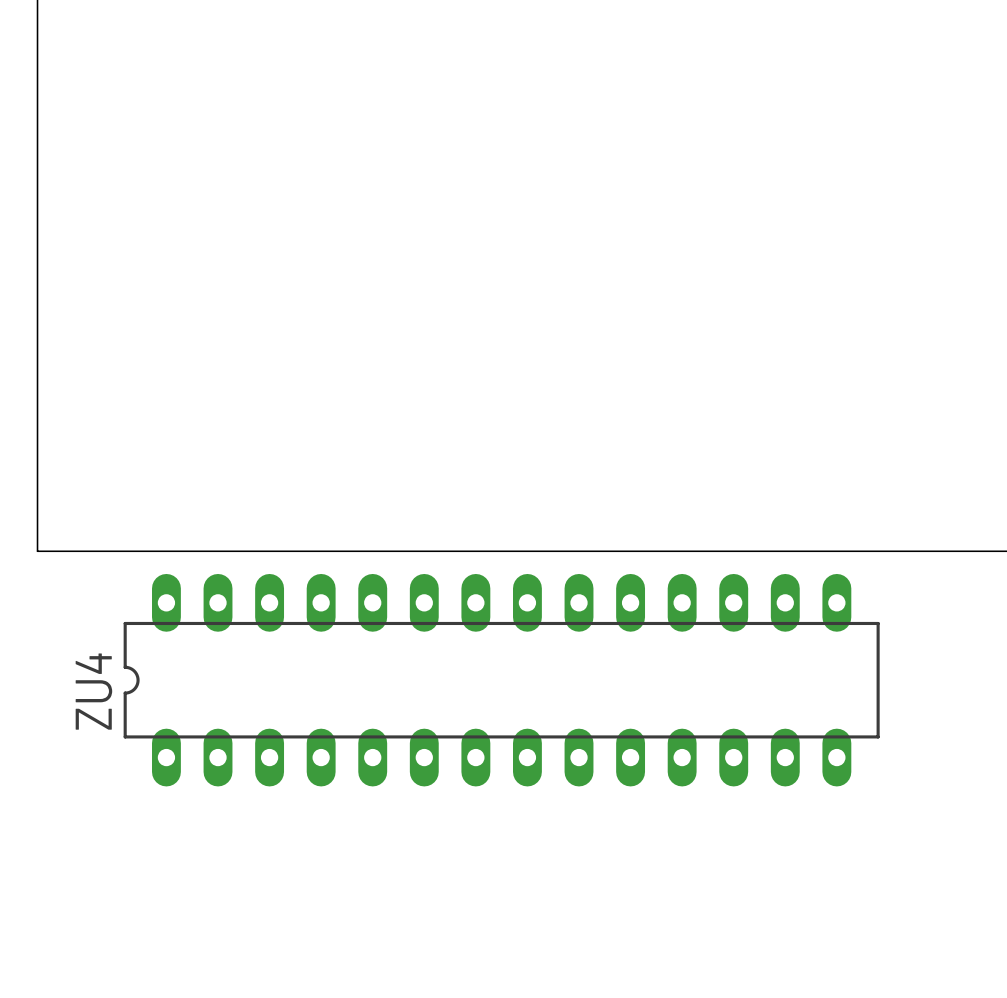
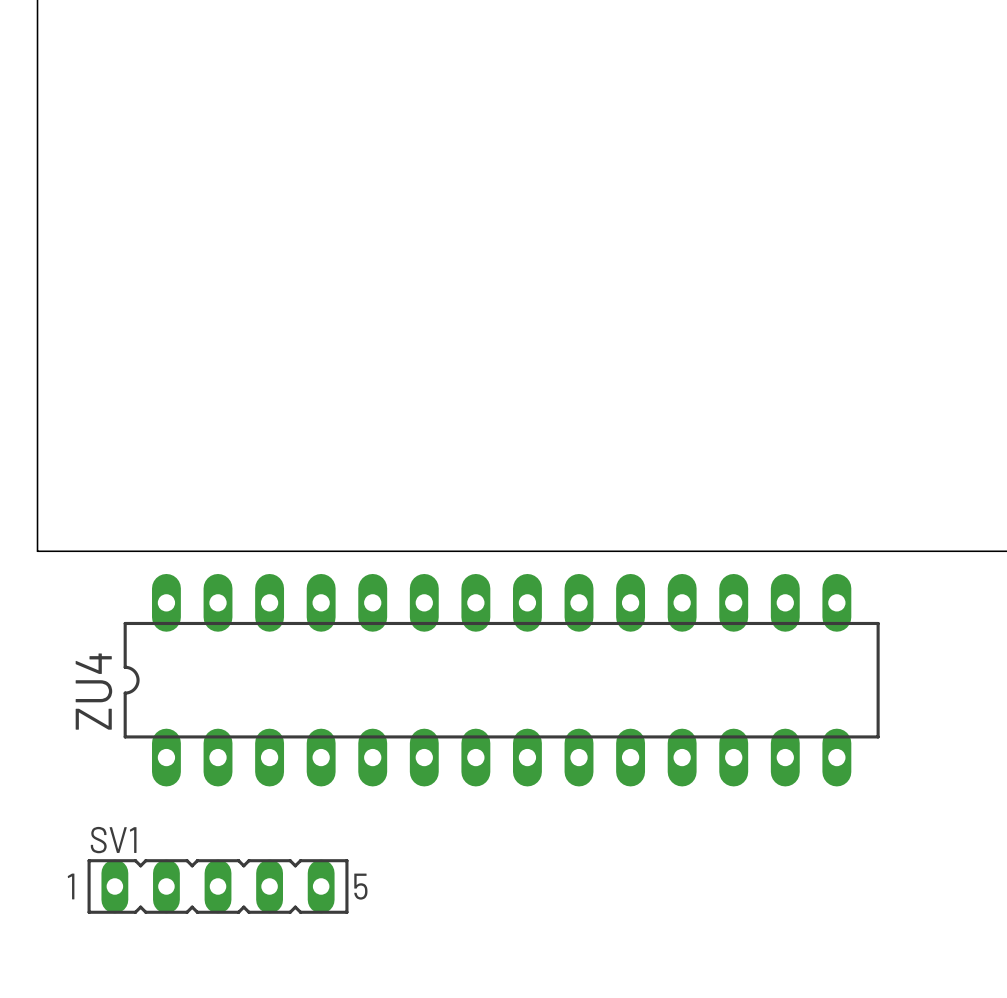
SV1: none -> (218, 886)

